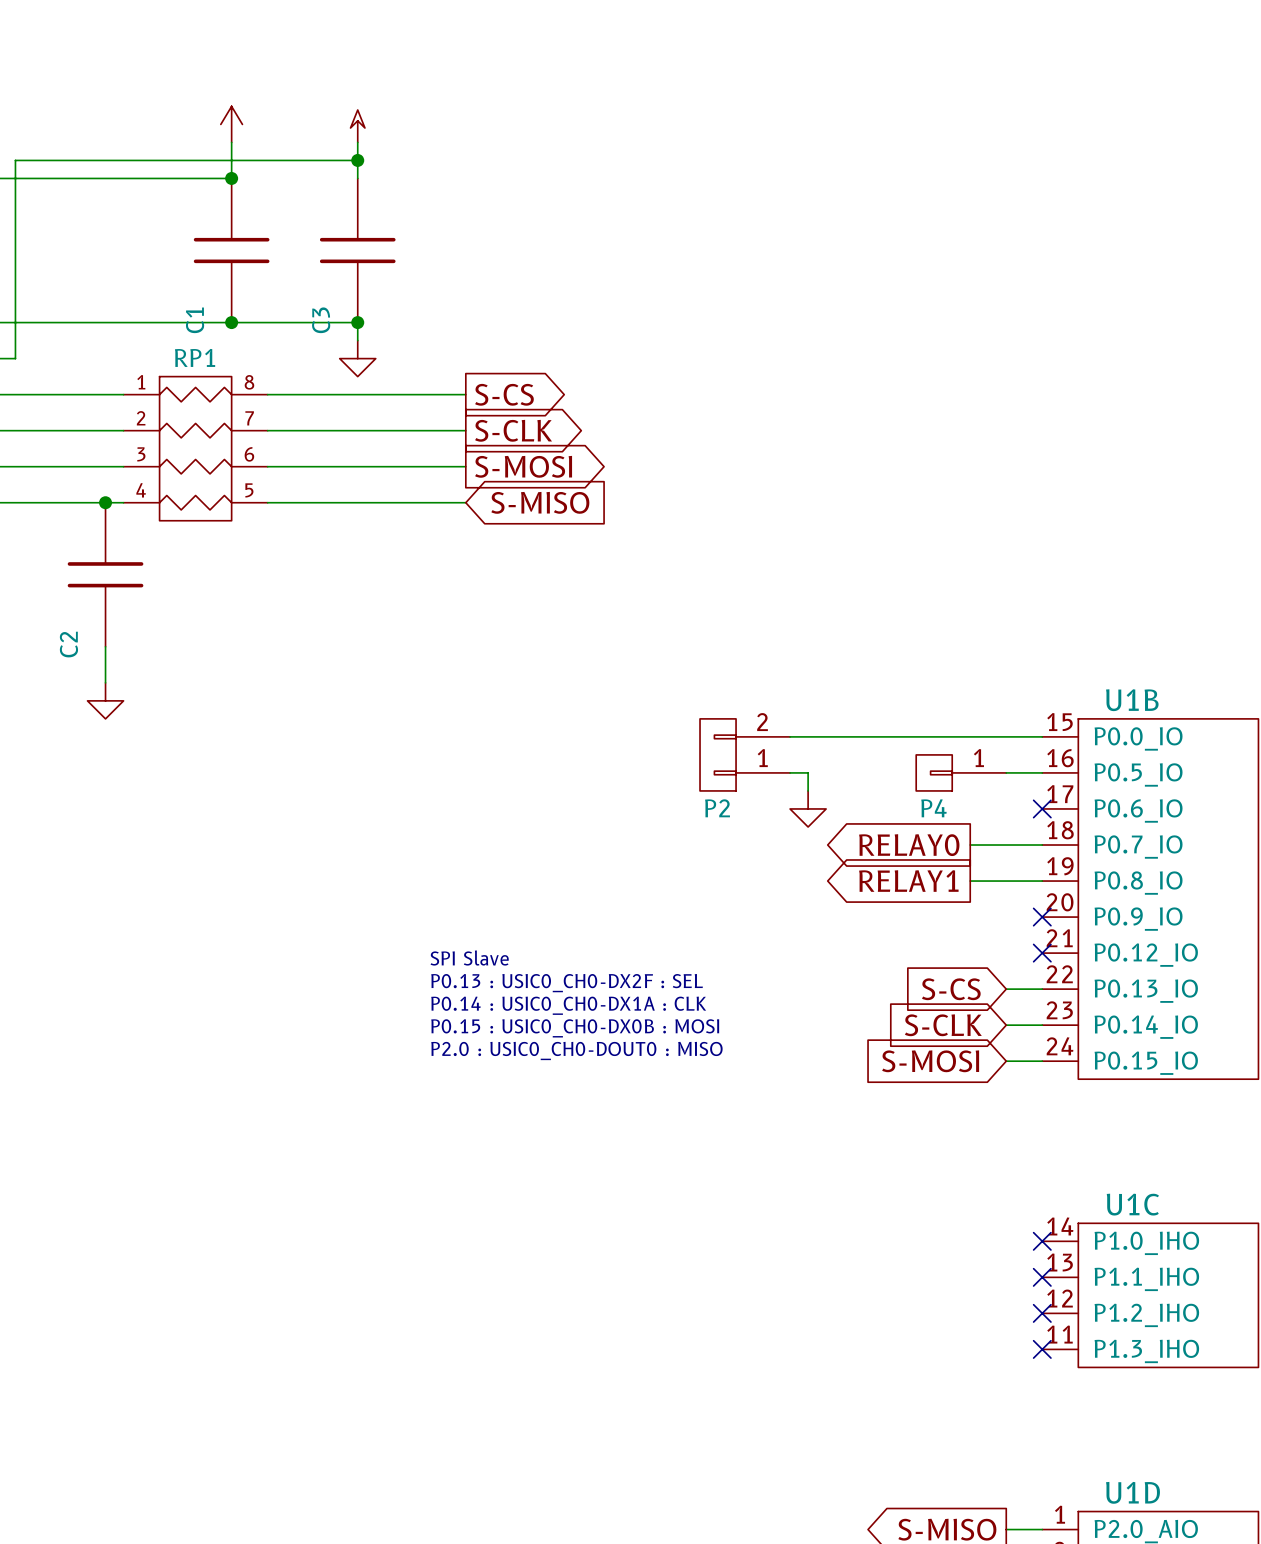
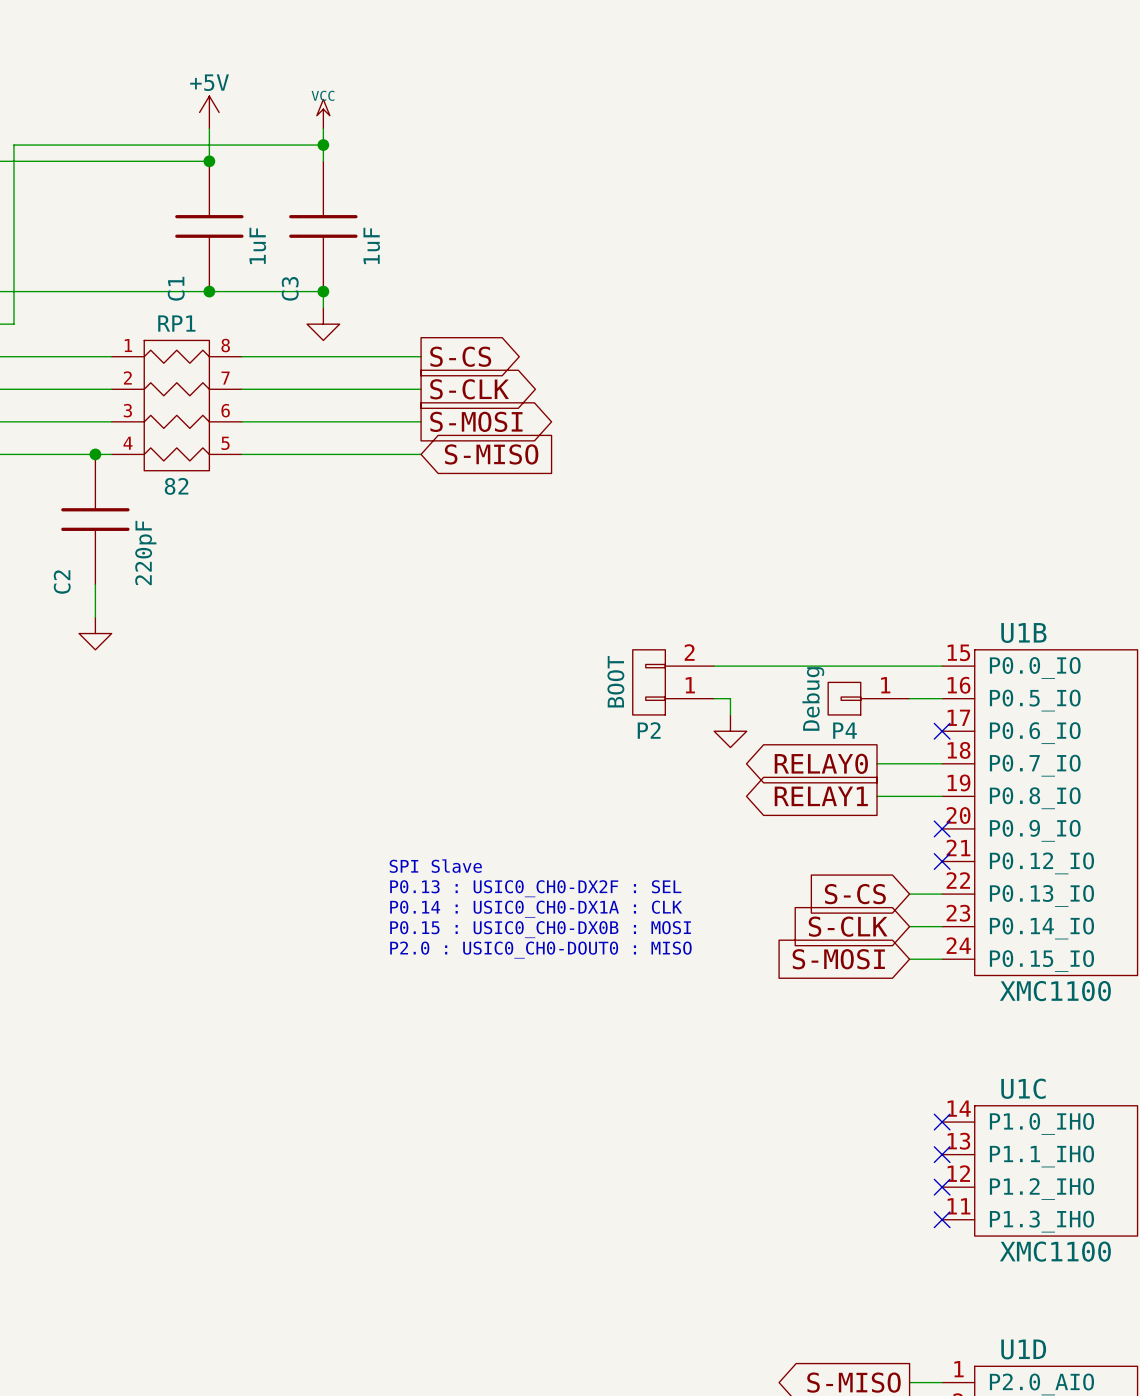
power symbol text: none -> +5V (209, 82)
power symbol text: none -> VCC (323, 95)
C1 value: none -> 1uF (257, 245)
C3 value: none -> 1uF (371, 245)
RP1 value: none -> 82 (176, 486)
C2 value: none -> 220pF (145, 553)
P2 value: none -> BOOT (615, 681)
P4 value: none -> Debug (813, 698)
U1B value: none -> XMC1100 (1055, 991)
U1C value: none -> XMC1100 (1055, 1251)

